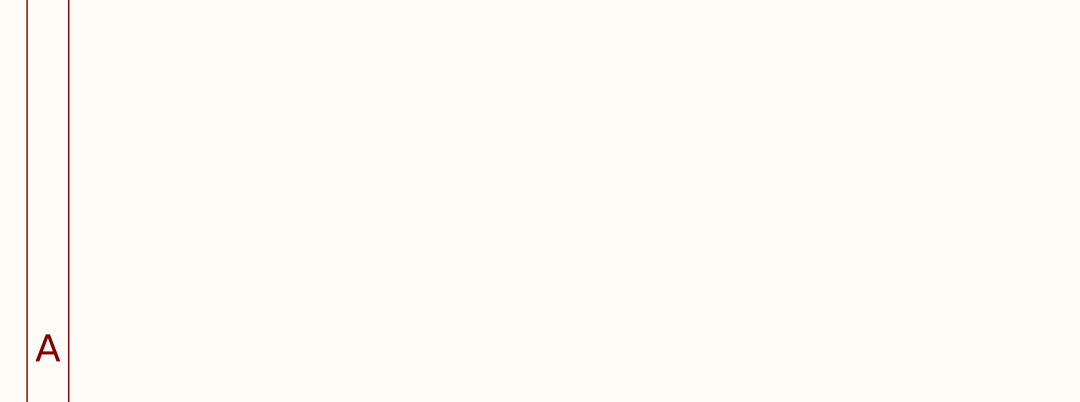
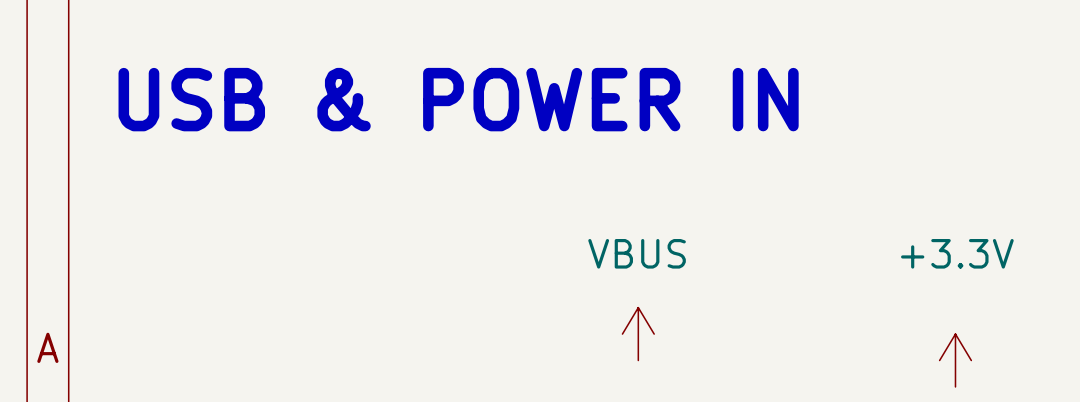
text: none -> USB & POWER IN (458, 99)
power symbol: none -> VBUS (638, 334)
power symbol: none -> +3.3V (955, 360)

